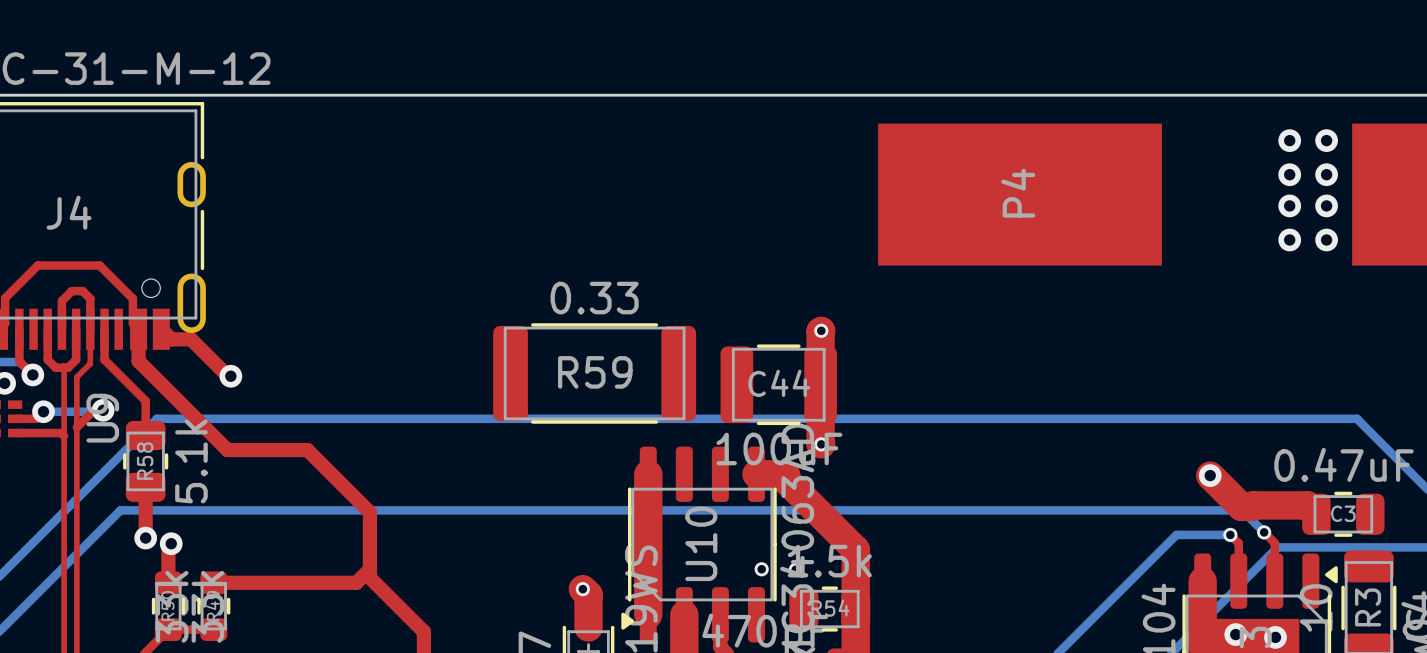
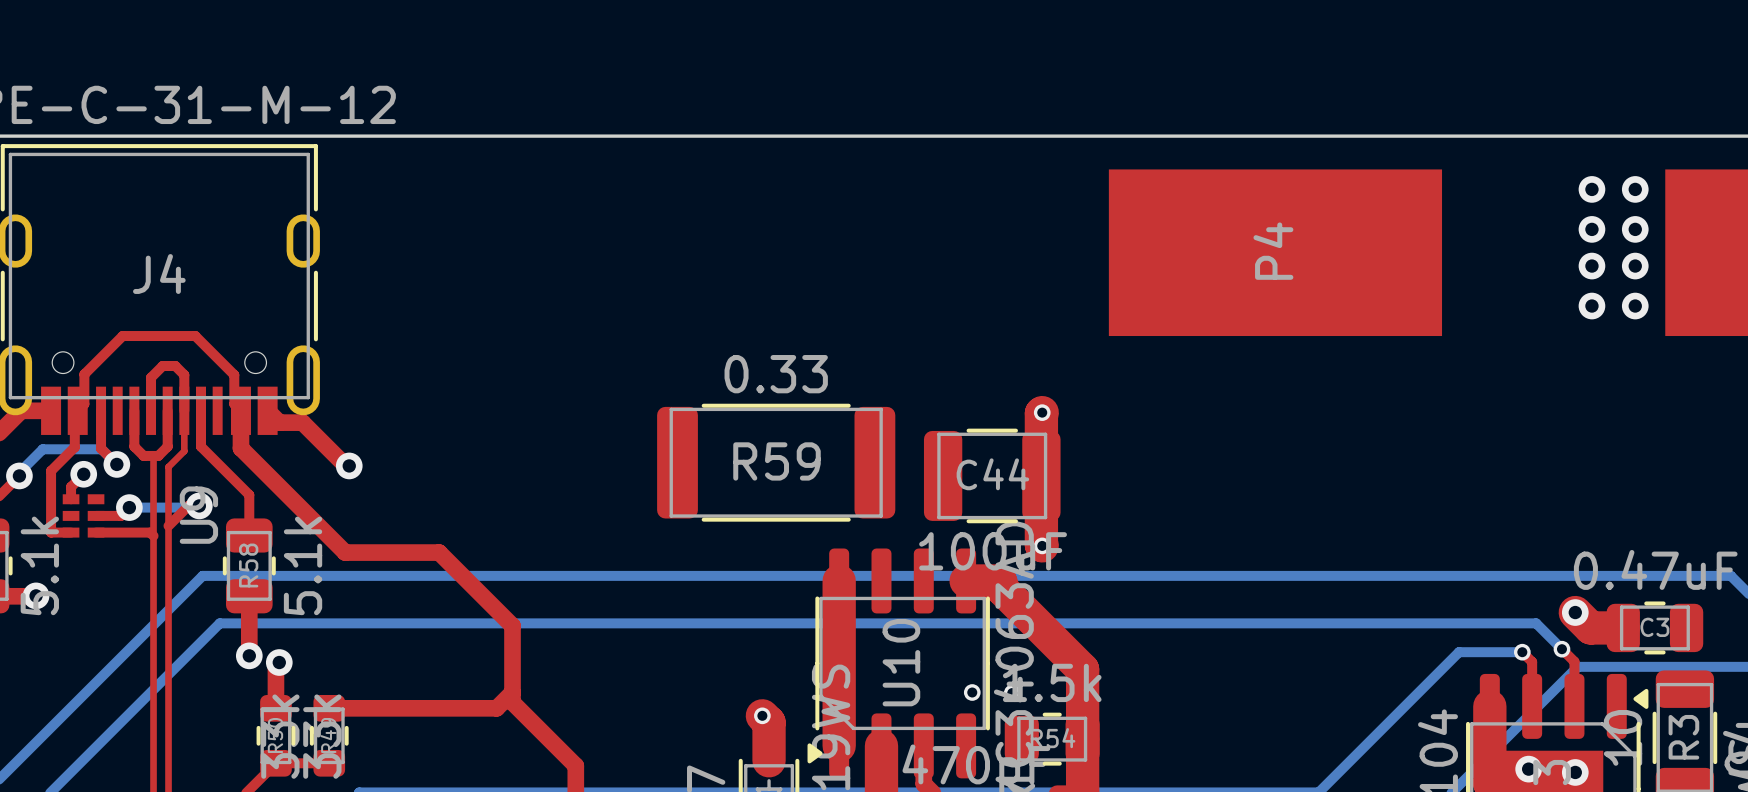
bottom track: (105, 469) (157, 418) (1356, 418) (1408, 469) -> (202, 575) (1730, 575)
top track: (1210, 475) (1241, 506) (1307, 505) (1316, 514) -> (1575, 612) (1590, 627) (1623, 627)
via position: (1210, 475) -> (1575, 612)

